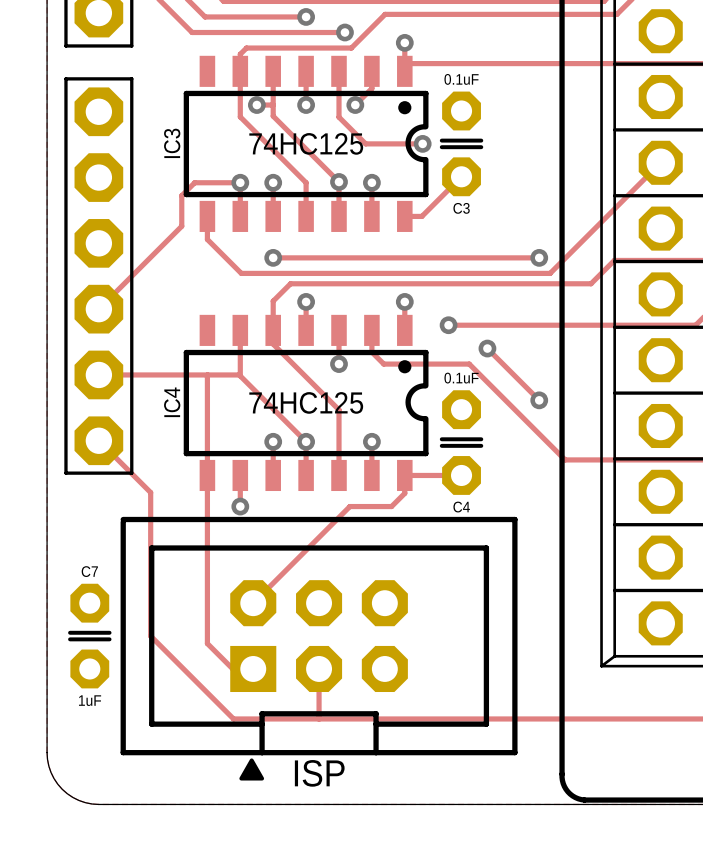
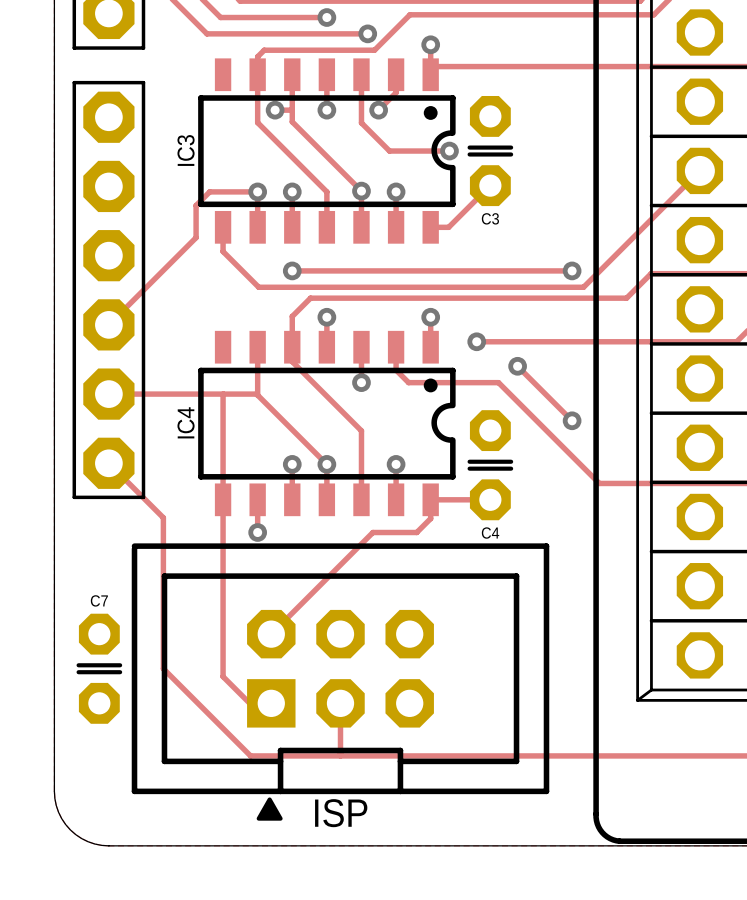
C3 value: 0.1uF (461, 79) -> none
IC3 value: 74HC125 (306, 143) -> none
C4 value: 0.1uF (461, 378) -> none
IC4 value: 74HC125 (306, 402) -> none
C7 value: 1uF (90, 700) -> none

